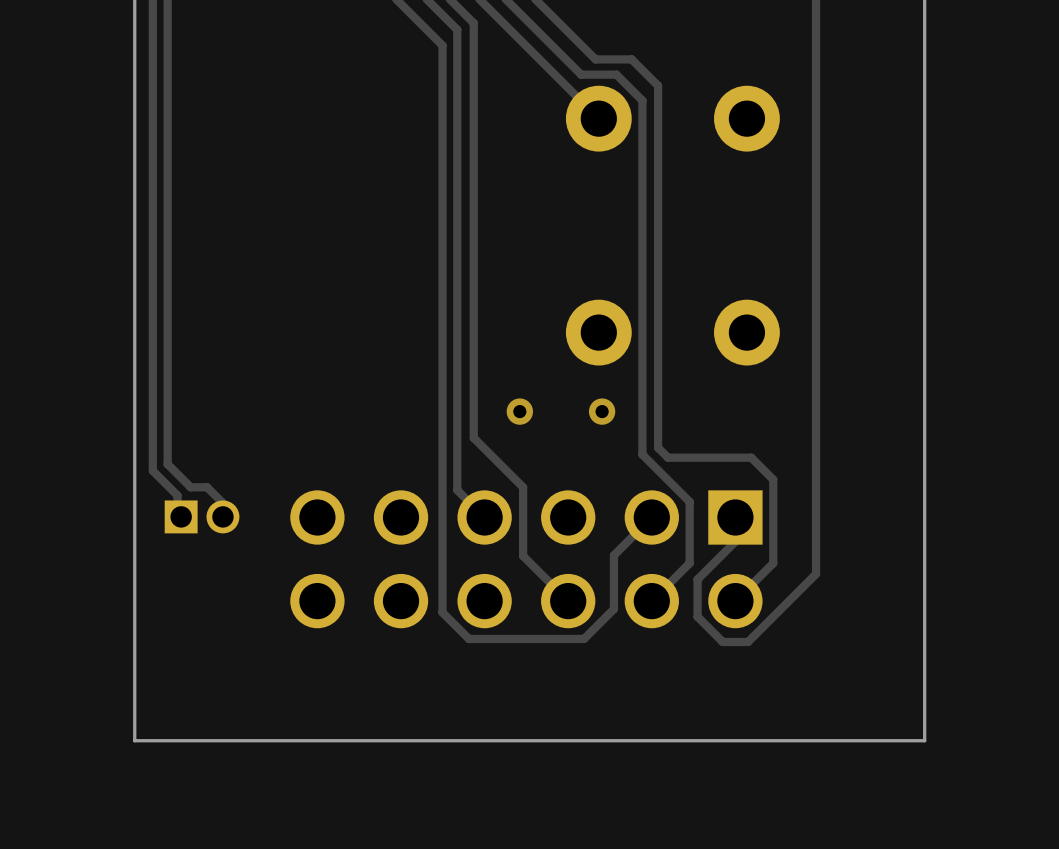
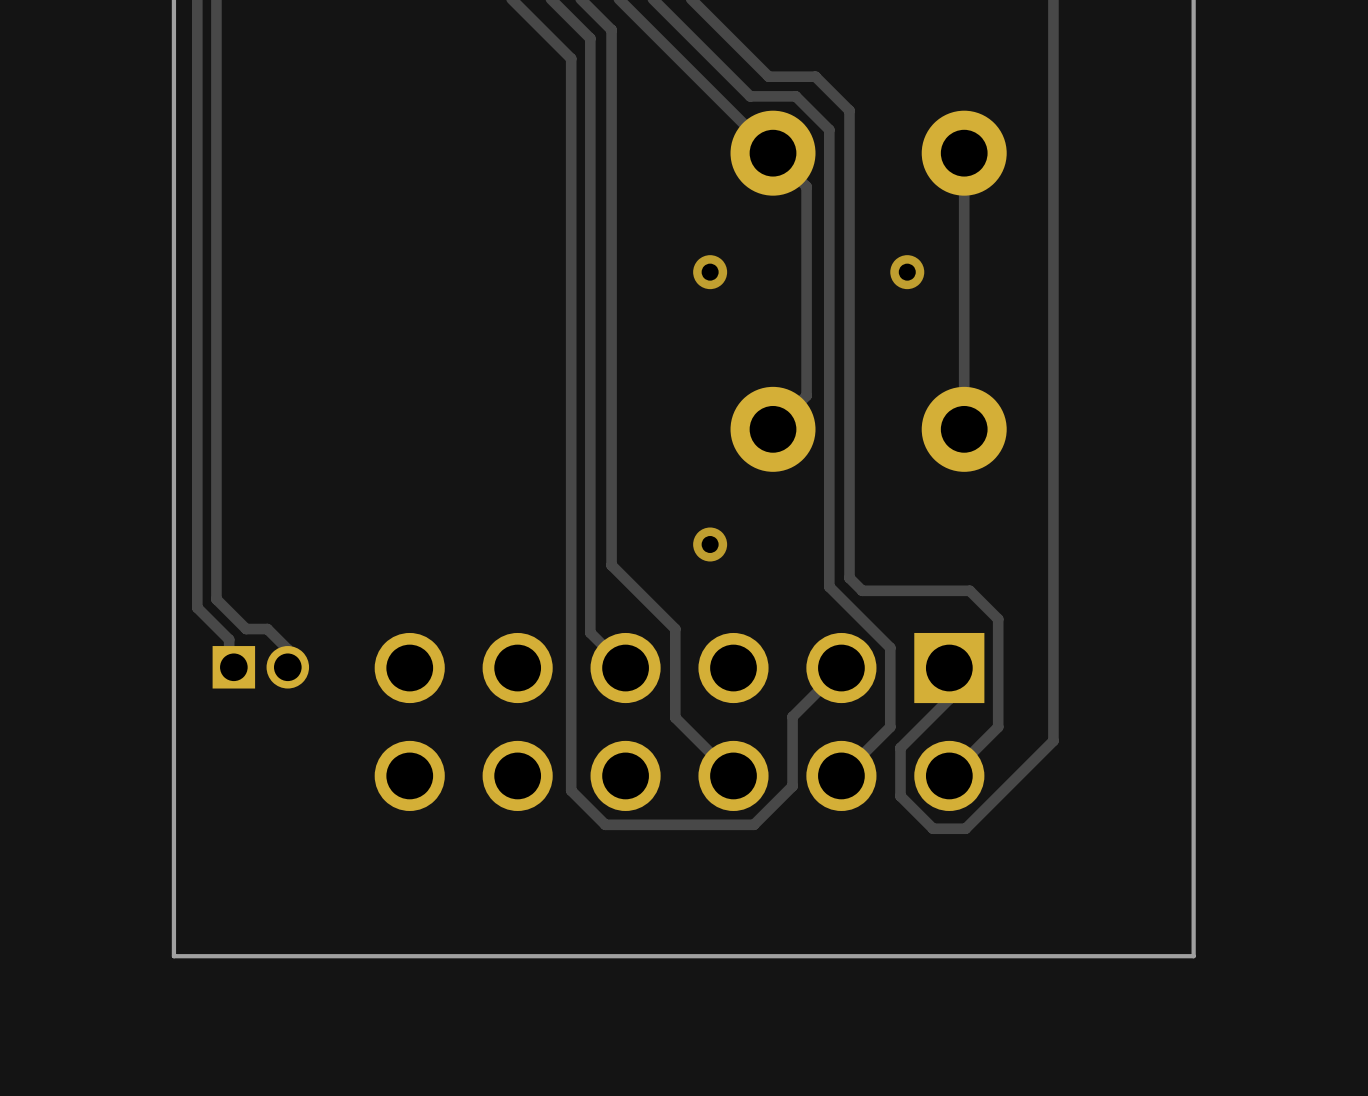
track: none -> (773, 153) (806, 186) (806, 395) (773, 429)
track: none -> (964, 153) (964, 429)
via: none -> (710, 272)
via: none -> (907, 272)
via: (519, 411) -> none
via: (602, 411) -> none
via: none -> (710, 544)

